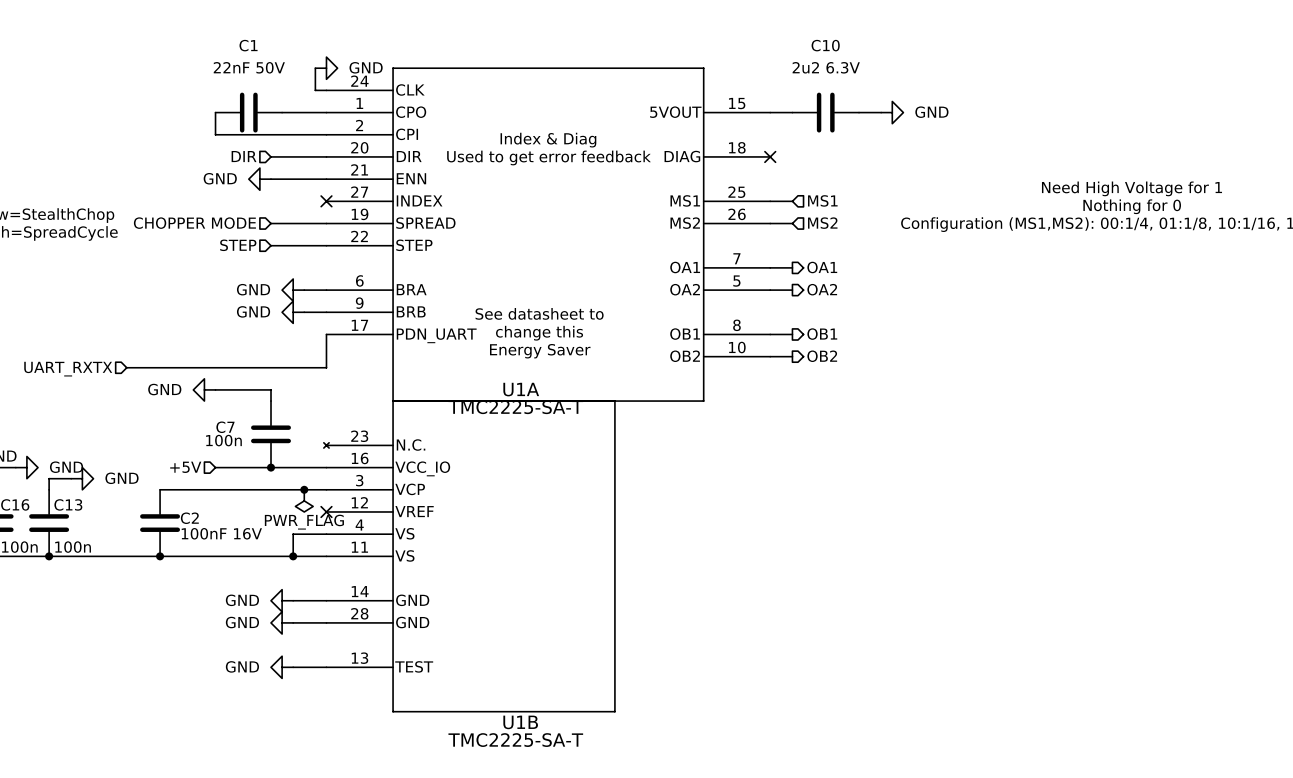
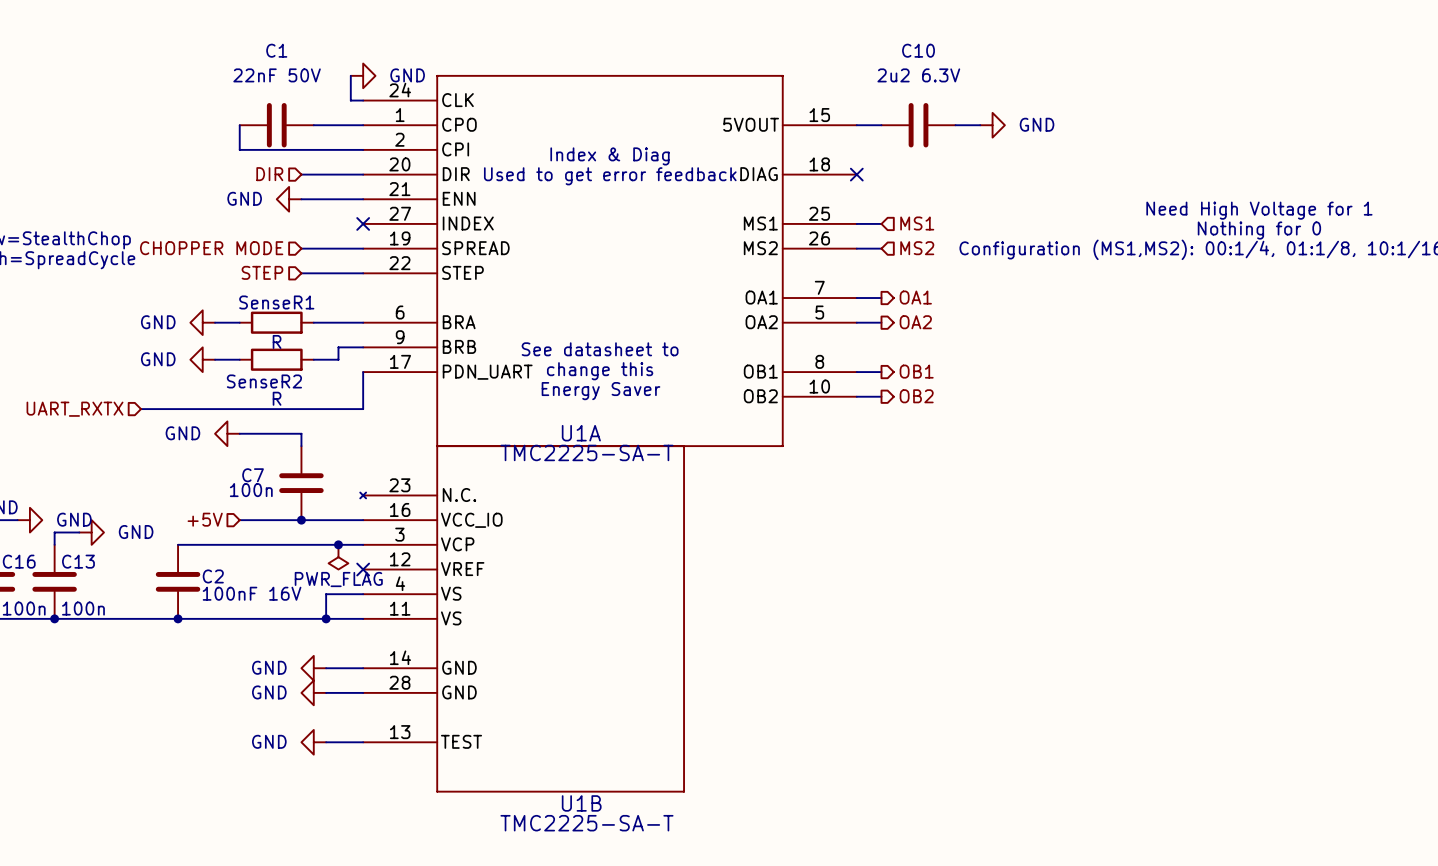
power symbol: none -> GND (202, 322)
wire: none -> (215, 322) (239, 322)
SenseR1: none -> R (276, 322)
power symbol: GND (293, 290) -> none
power symbol: GND (293, 312) -> none
wire: none -> (338, 347) (338, 359) (313, 359)
power symbol: none -> GND (202, 359)
wire: none -> (215, 359) (239, 359)
SenseR2: none -> R (276, 359)

